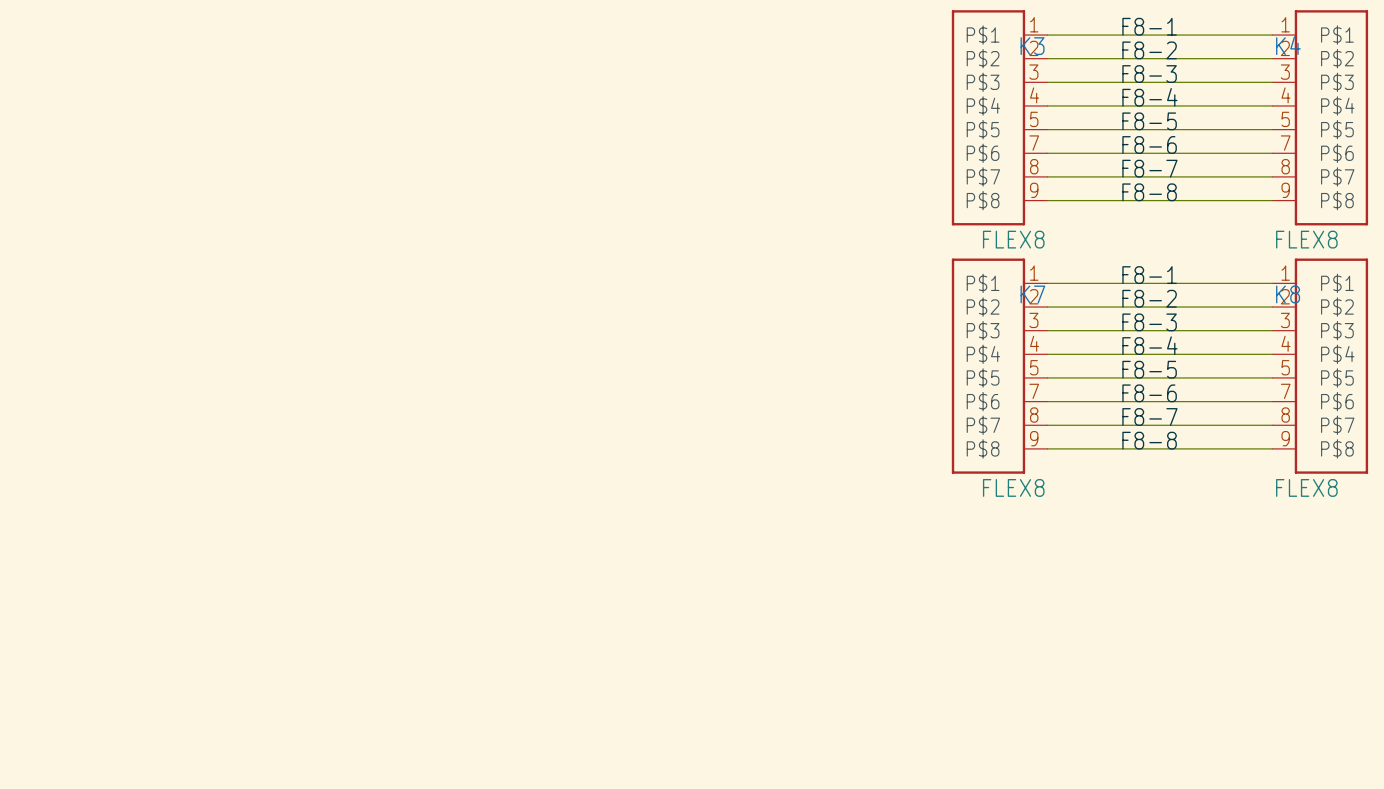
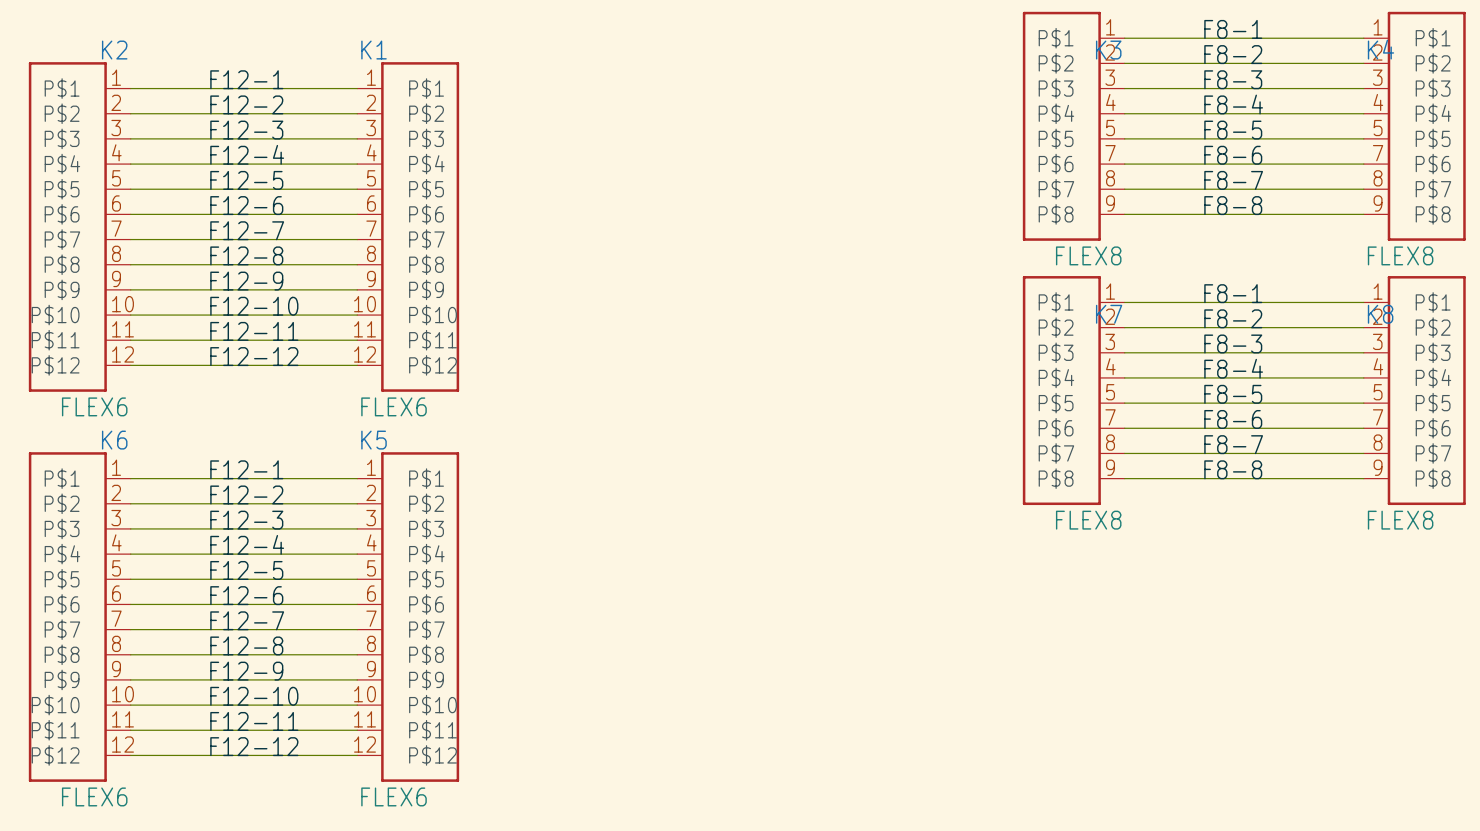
label: none -> F12-1 (246, 79)
wire: none -> (130, 88) (357, 88)
label: none -> F12-2 (246, 104)
wire: none -> (130, 113) (357, 113)
label: none -> F12-3 (246, 130)
wire: none -> (130, 138) (357, 138)
label: none -> F12-4 (247, 154)
wire: none -> (130, 164) (357, 164)
label: none -> F12-5 (246, 180)
wire: none -> (130, 189) (357, 189)
label: none -> F12-6 (246, 205)
wire: none -> (130, 214) (357, 214)
K2: none -> FLEX6 (79, 226)
K1: none -> FLEX6 (408, 226)
label: none -> F12-7 (247, 230)
wire: none -> (130, 239) (357, 239)
label: none -> F12-8 (246, 255)
wire: none -> (130, 264) (357, 264)
label: none -> F12-9 (246, 281)
wire: none -> (130, 289) (357, 289)
label: none -> F12-10 (254, 306)
wire: none -> (130, 315) (357, 315)
label: none -> F12-11 (254, 331)
wire: none -> (130, 340) (357, 340)
label: none -> F12-12 (254, 356)
wire: none -> (130, 365) (357, 365)
label: none -> F12-1 (246, 469)
wire: none -> (130, 478) (357, 478)
label: none -> F12-2 (246, 494)
wire: none -> (130, 503) (357, 503)
label: none -> F12-3 (246, 520)
wire: none -> (130, 528) (357, 528)
label: none -> F12-4 (247, 544)
wire: none -> (130, 554) (357, 554)
label: none -> F12-5 (246, 570)
wire: none -> (130, 579) (357, 579)
label: none -> F12-6 (246, 595)
wire: none -> (130, 604) (357, 604)
K6: none -> FLEX6 (79, 617)
K5: none -> FLEX6 (408, 617)
label: none -> F12-7 (247, 620)
wire: none -> (130, 629) (357, 629)
label: none -> F12-8 (246, 645)
wire: none -> (130, 654) (357, 654)
label: none -> F12-9 (246, 671)
wire: none -> (130, 679) (357, 679)
label: none -> F12-10 (254, 696)
wire: none -> (130, 705) (357, 705)
label: none -> F12-11 (254, 721)
wire: none -> (130, 730) (357, 730)
label: none -> F12-12 (254, 746)
wire: none -> (130, 755) (357, 755)

